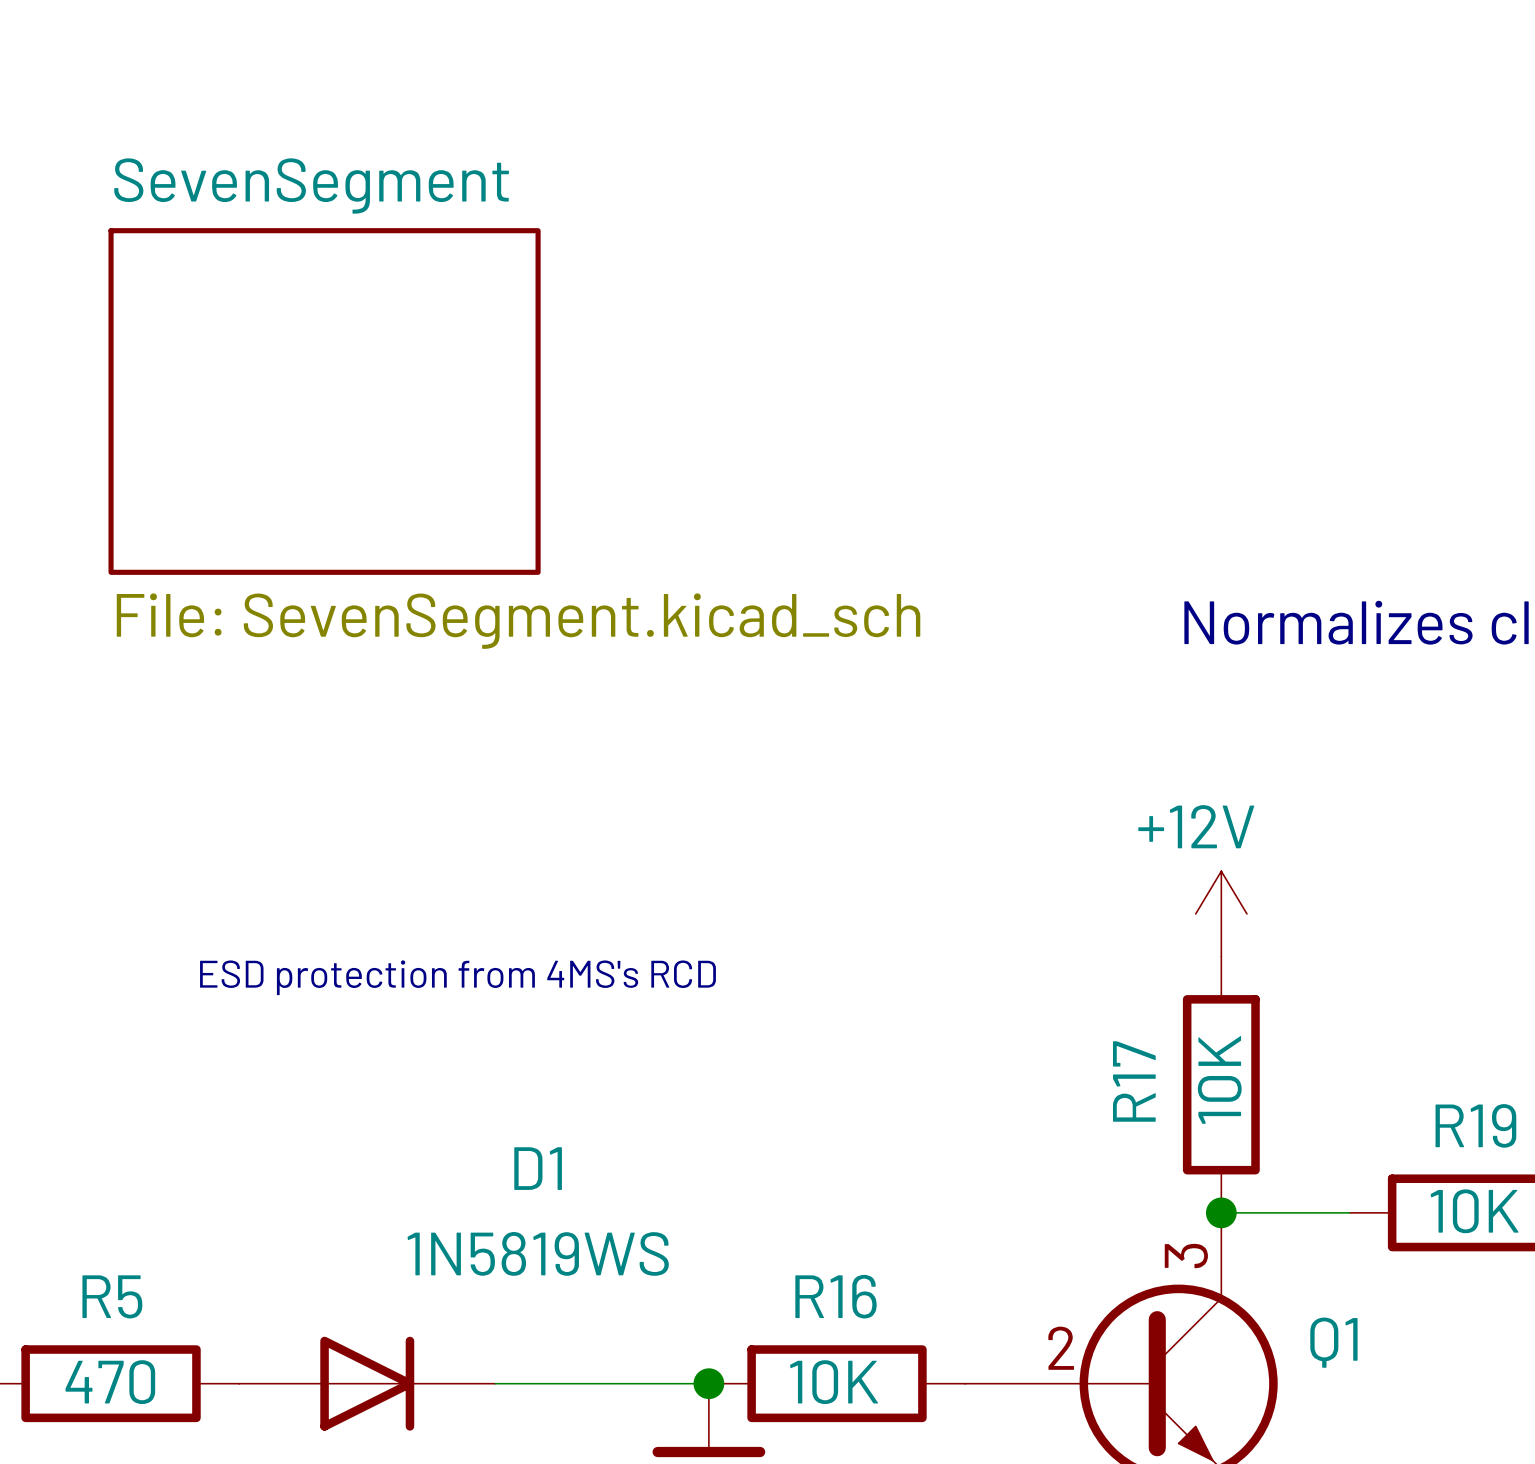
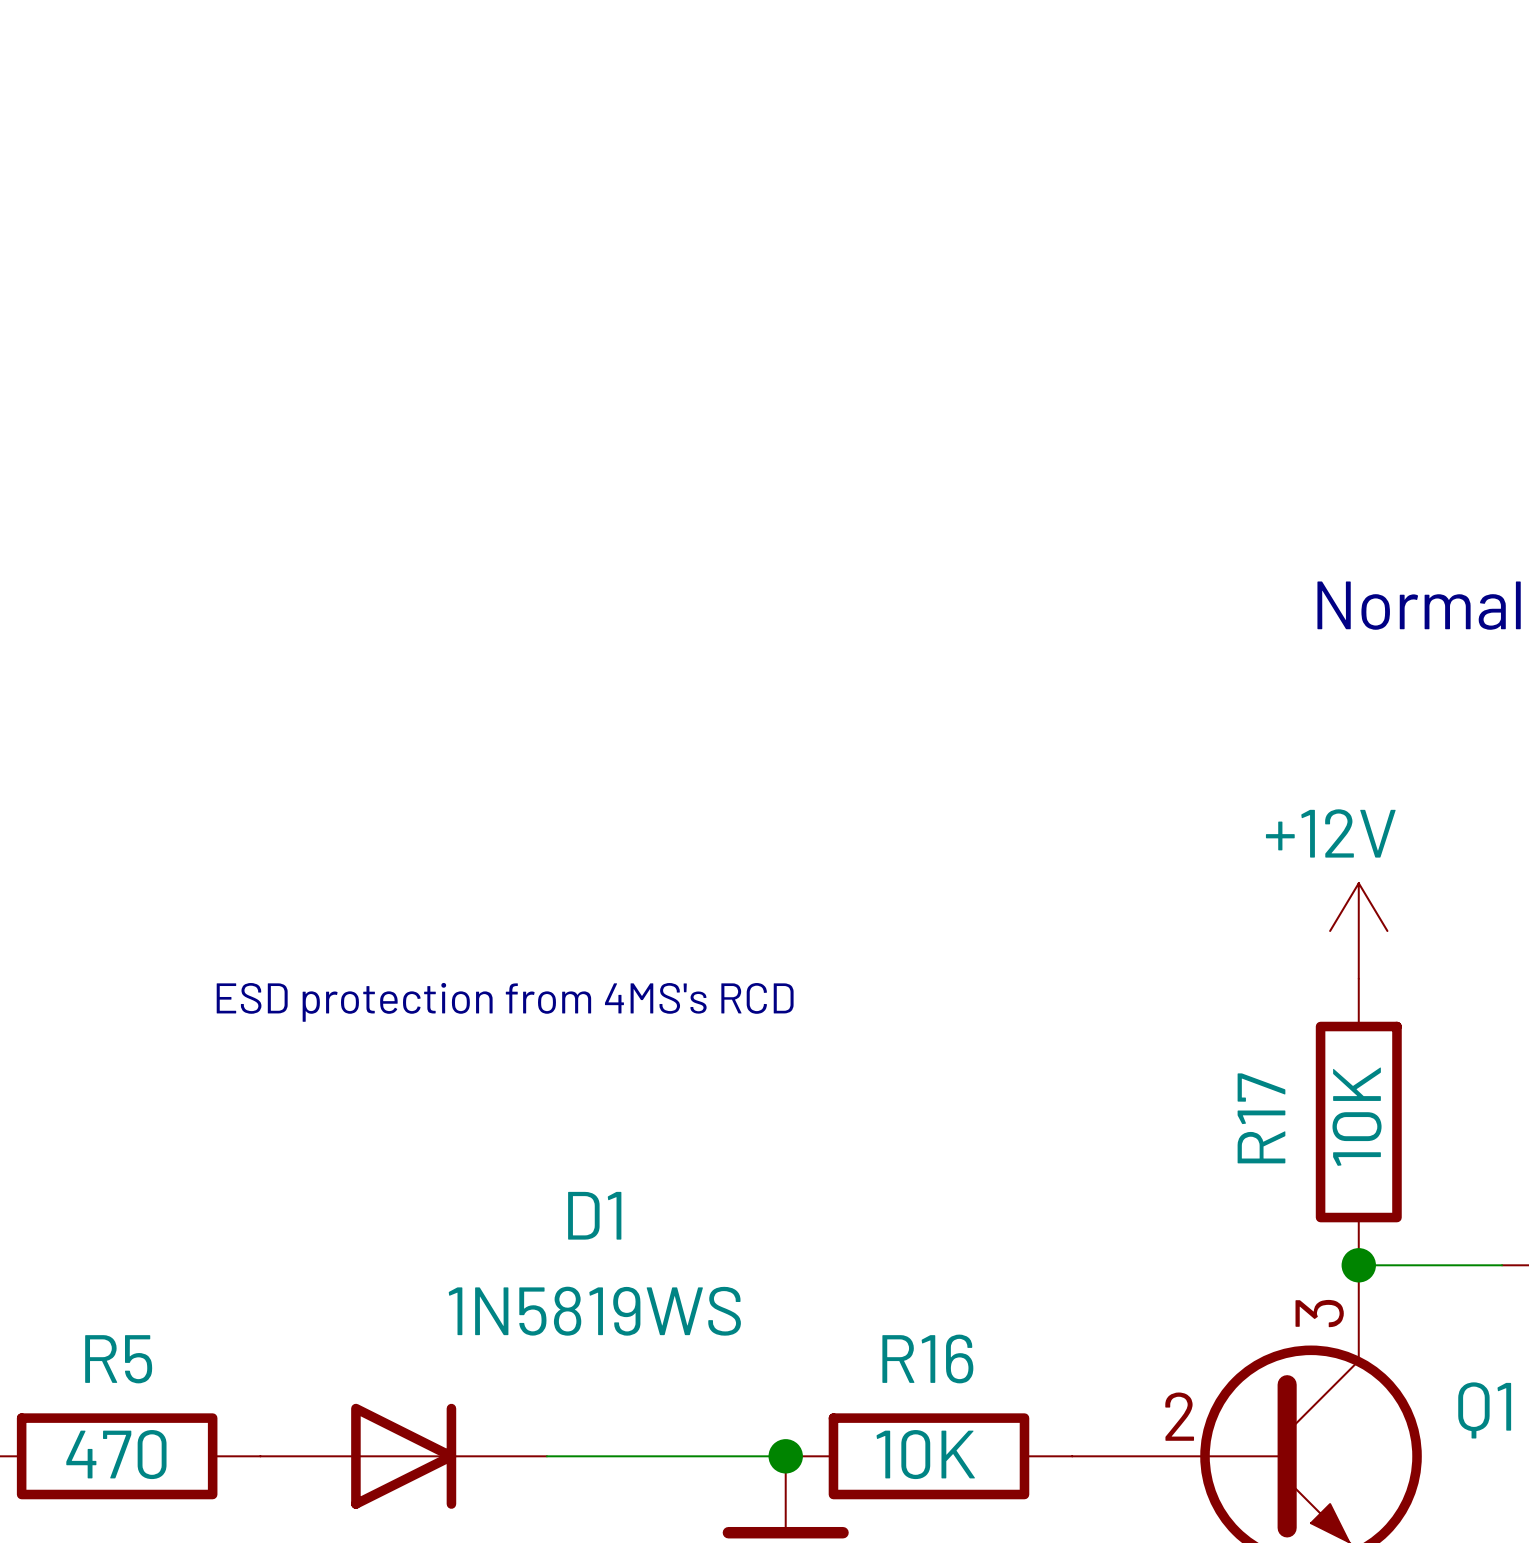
sheet SevenSegment: File: SevenSegment.kicad_sch (324, 401) -> none

